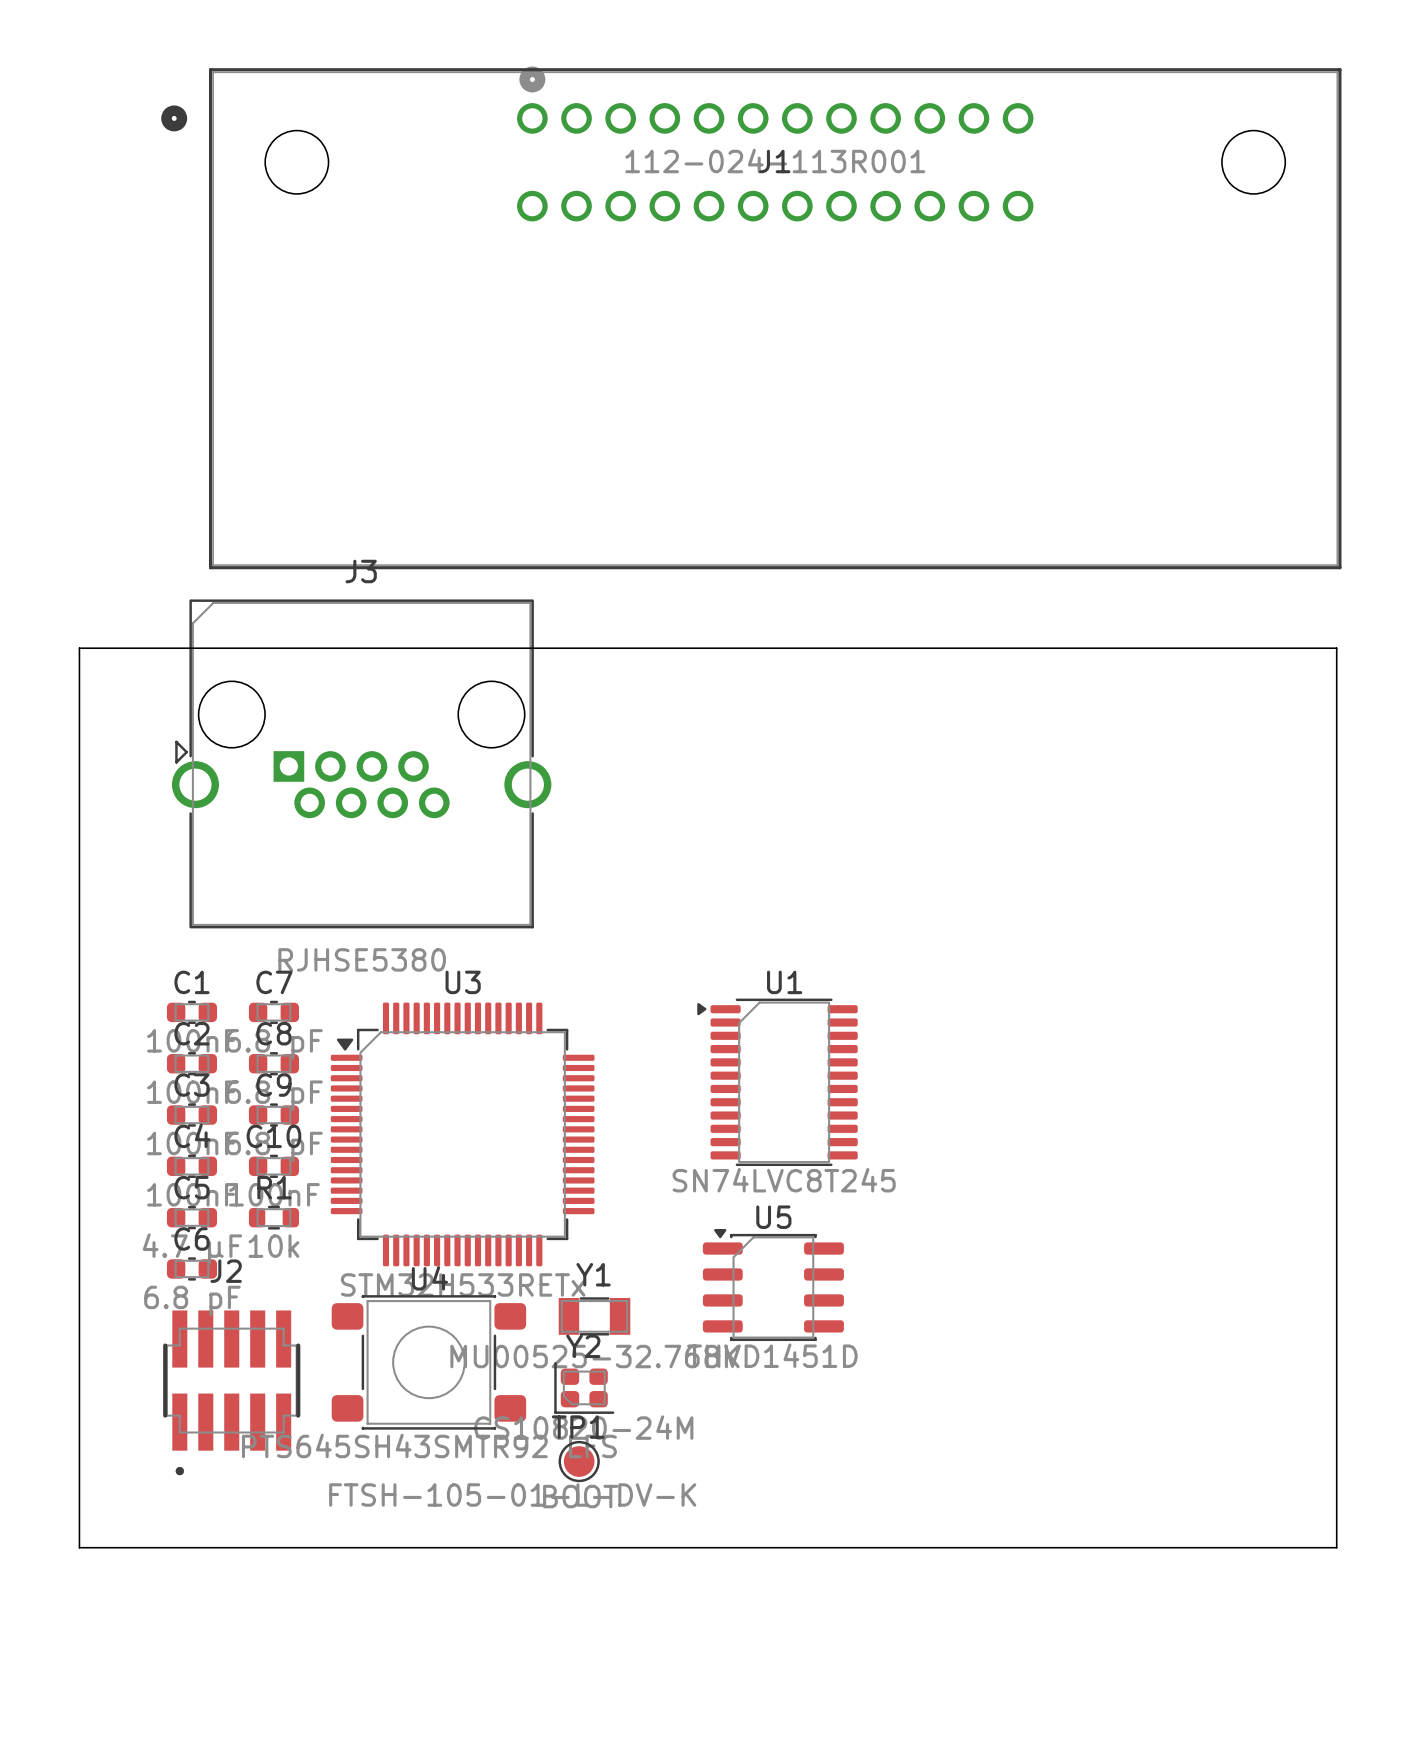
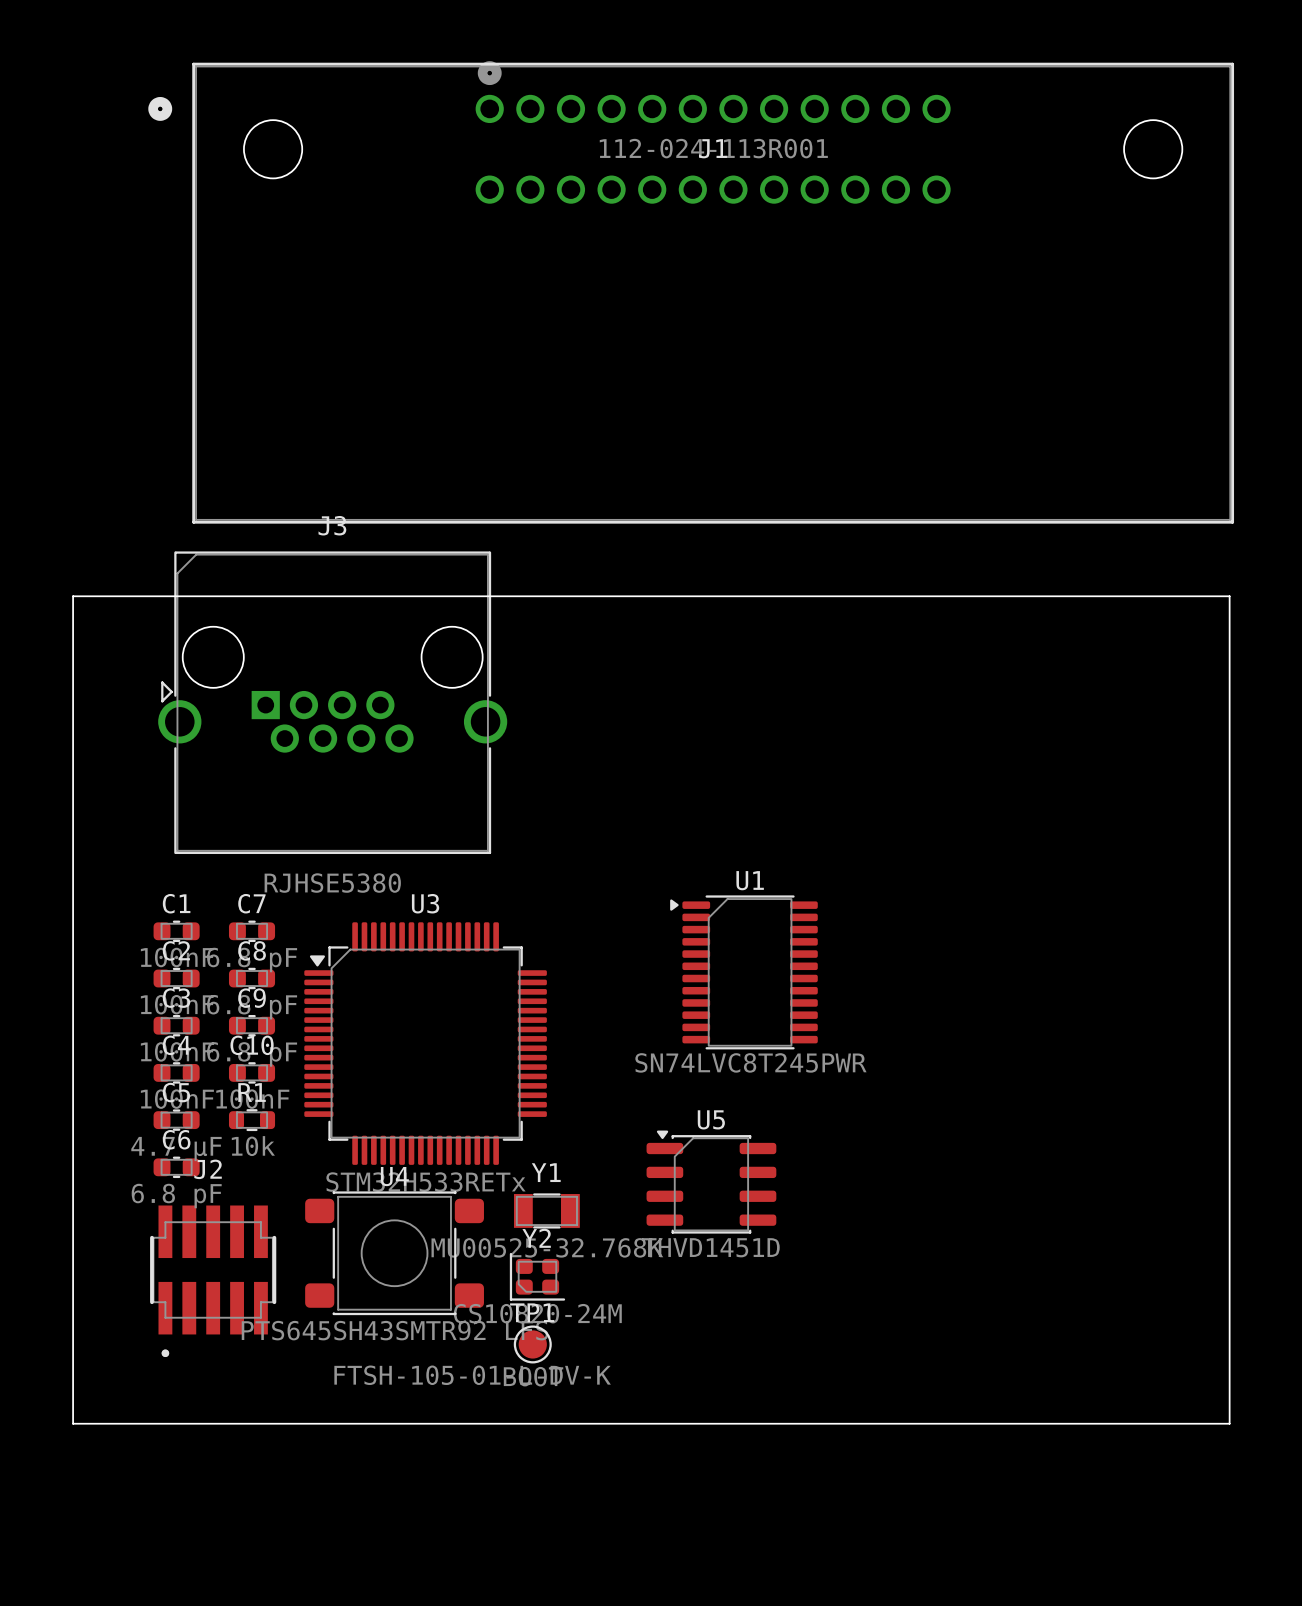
U1 position: (777, 1082) -> (743, 972)
U1 value: SN74LVC8T245 (784, 1180) -> SN74LVC8T245PWR (750, 1062)

